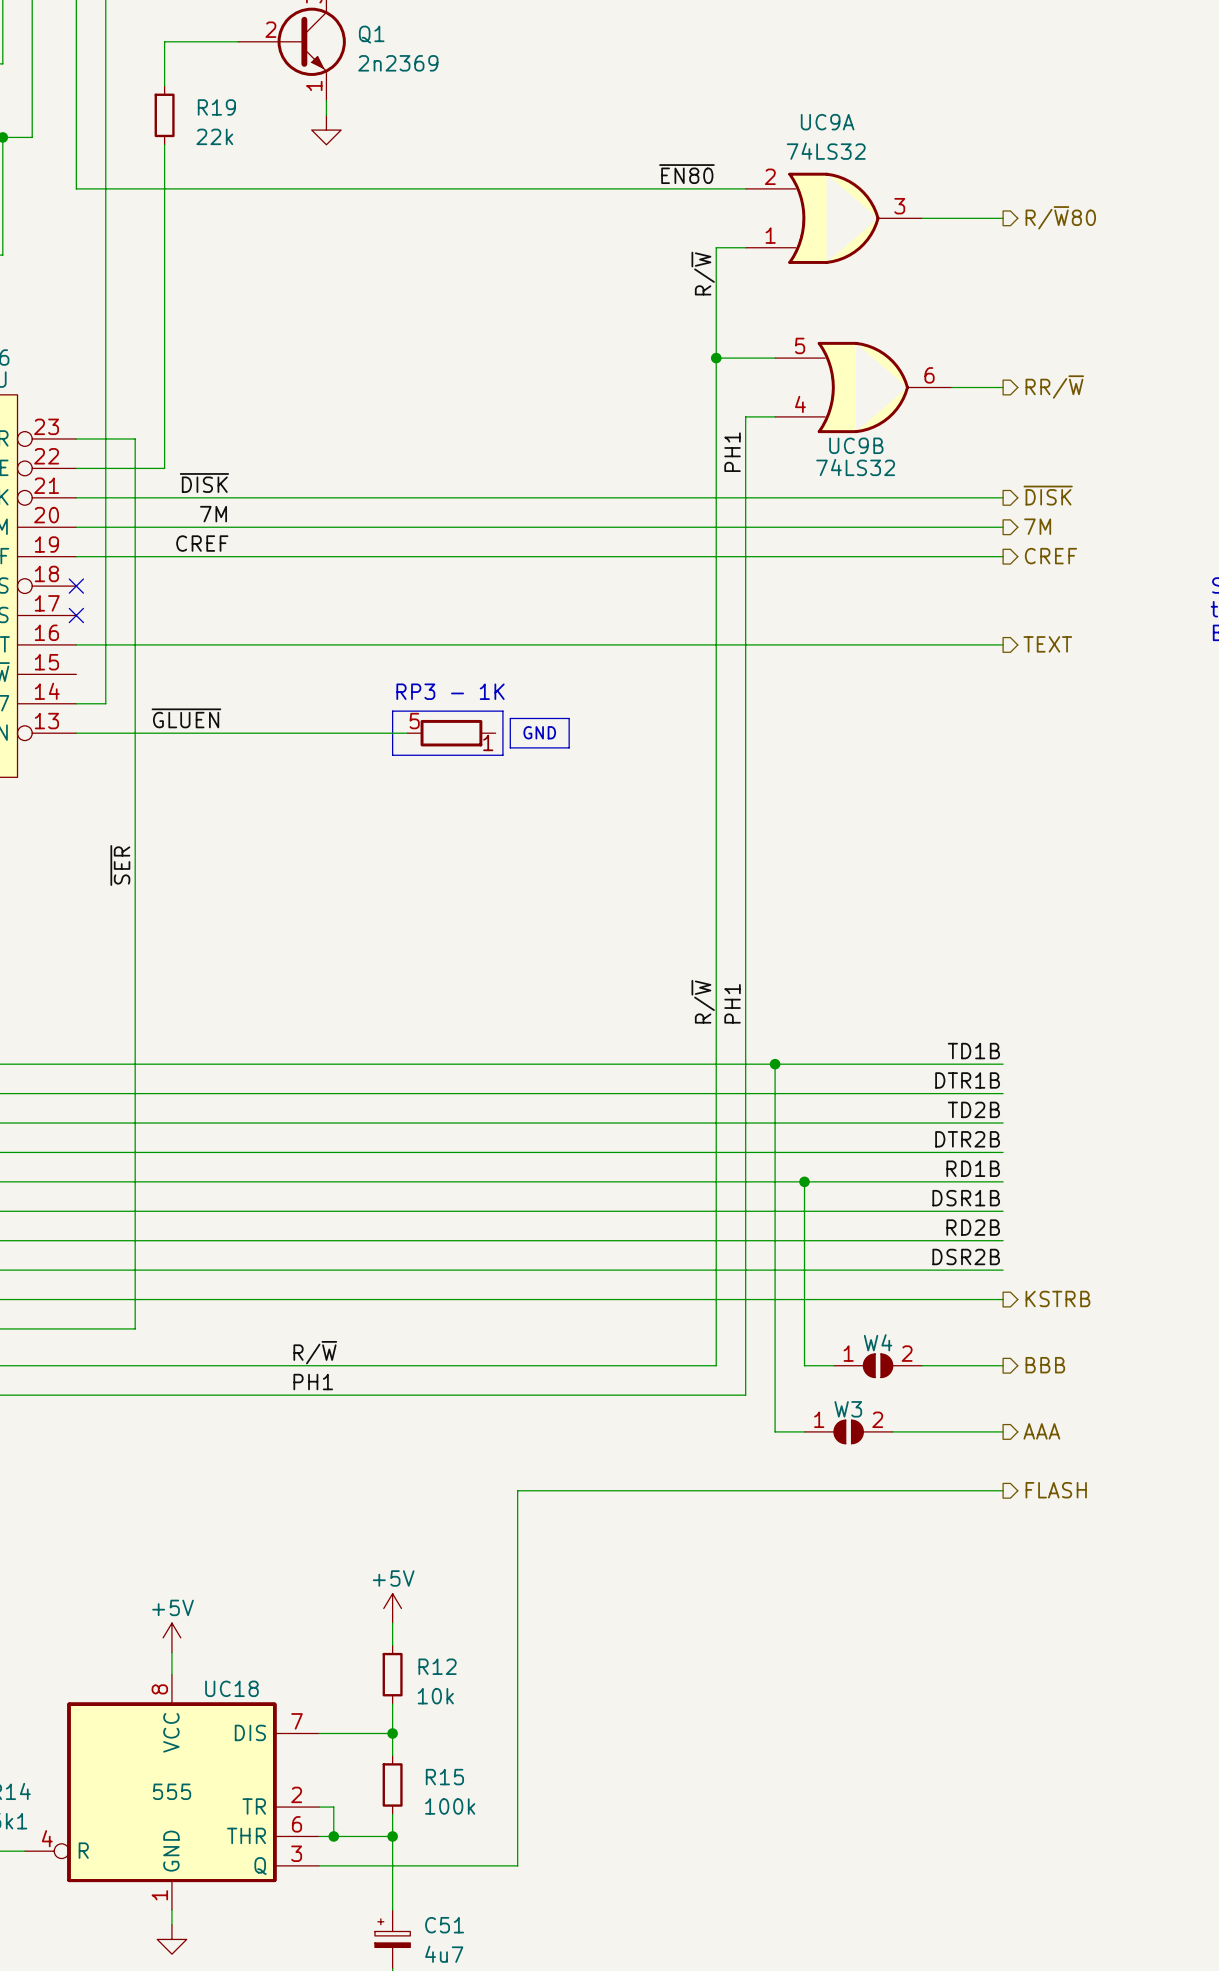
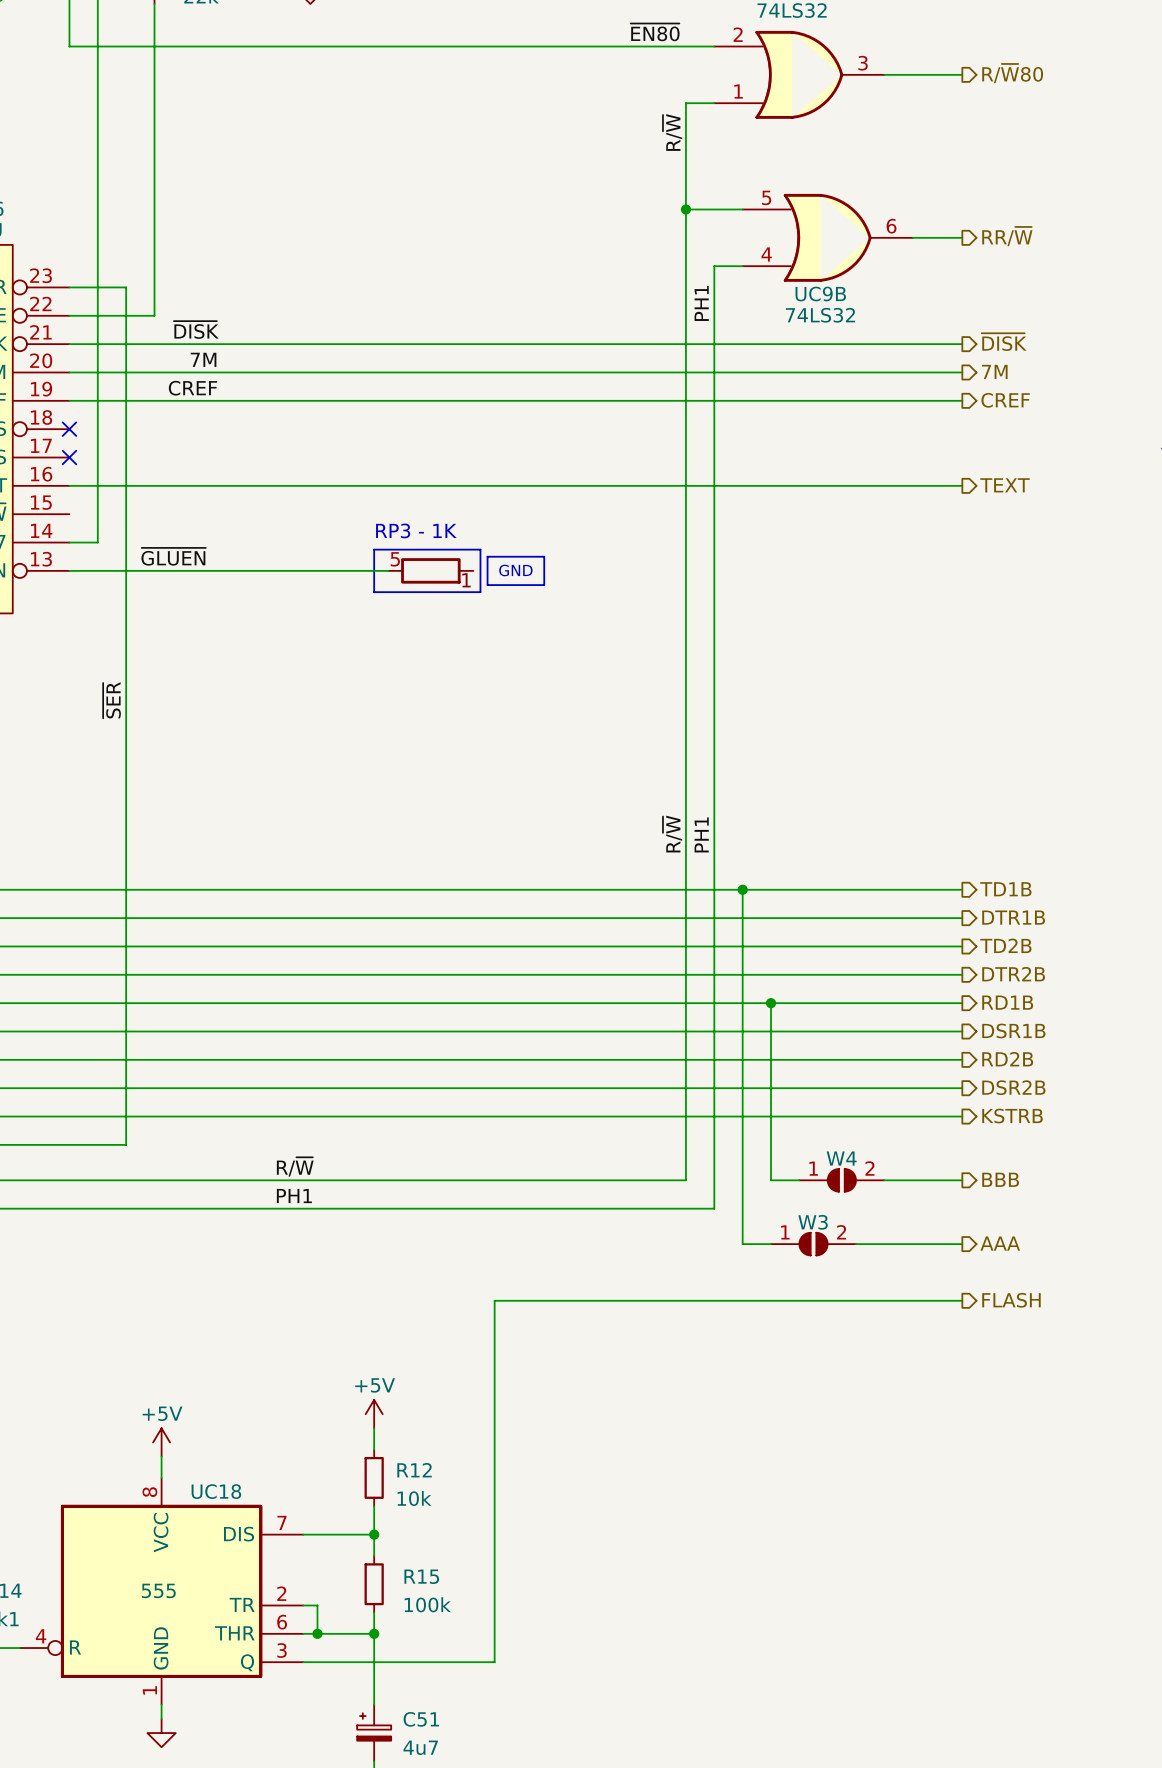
label: TD1B (973, 1051) -> none
hierarchical label: none -> TD1B (1005, 889)
label: DTR1B (967, 1080) -> none
hierarchical label: none -> DTR1B (1013, 917)
label: TD2B (973, 1109) -> none
hierarchical label: none -> TD2B (1005, 945)
label: DTR2B (967, 1139) -> none
hierarchical label: none -> DTR2B (1013, 974)
label: RD1B (973, 1168) -> none
hierarchical label: none -> RD1B (1007, 1002)
label: DSR1B (966, 1198) -> none
hierarchical label: none -> DSR1B (1013, 1030)
label: RD2B (973, 1227) -> none
hierarchical label: none -> RD2B (1007, 1059)
label: DSR2B (966, 1256) -> none
hierarchical label: none -> DSR2B (1013, 1087)

